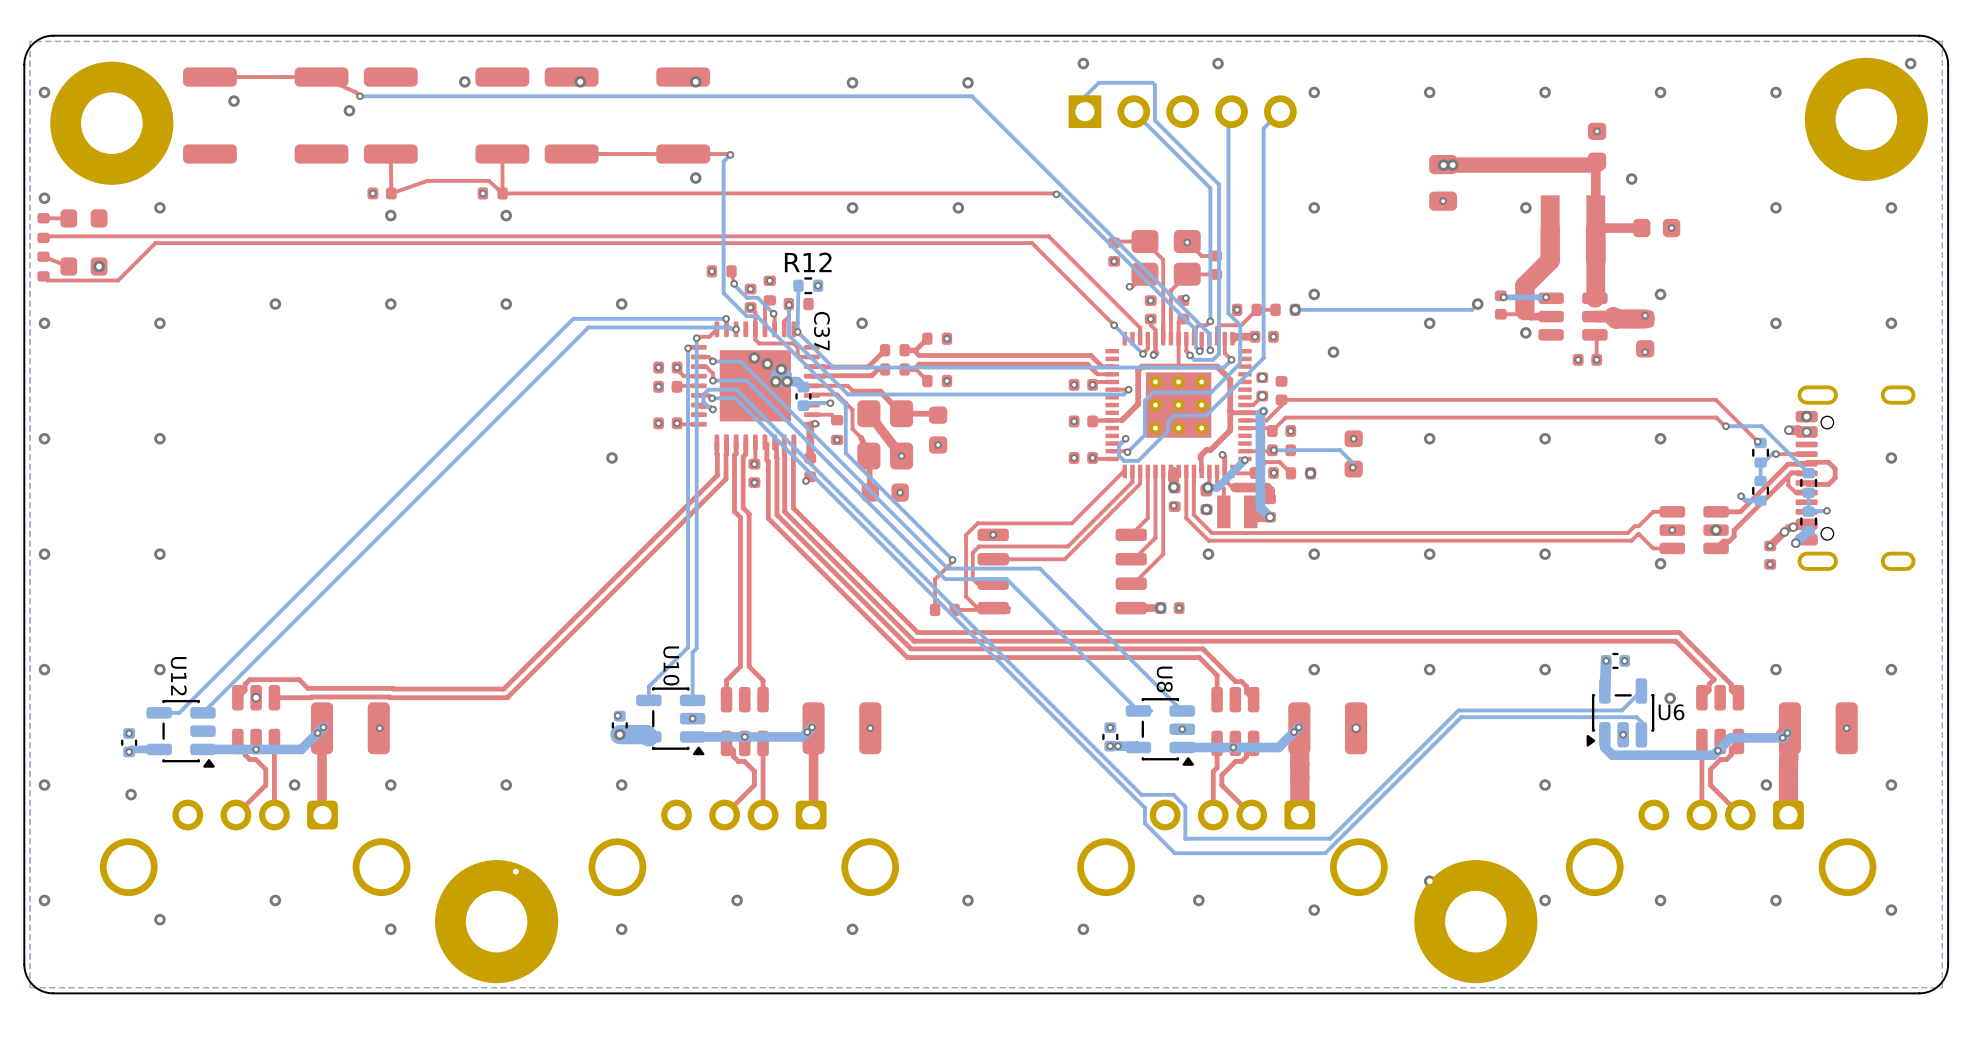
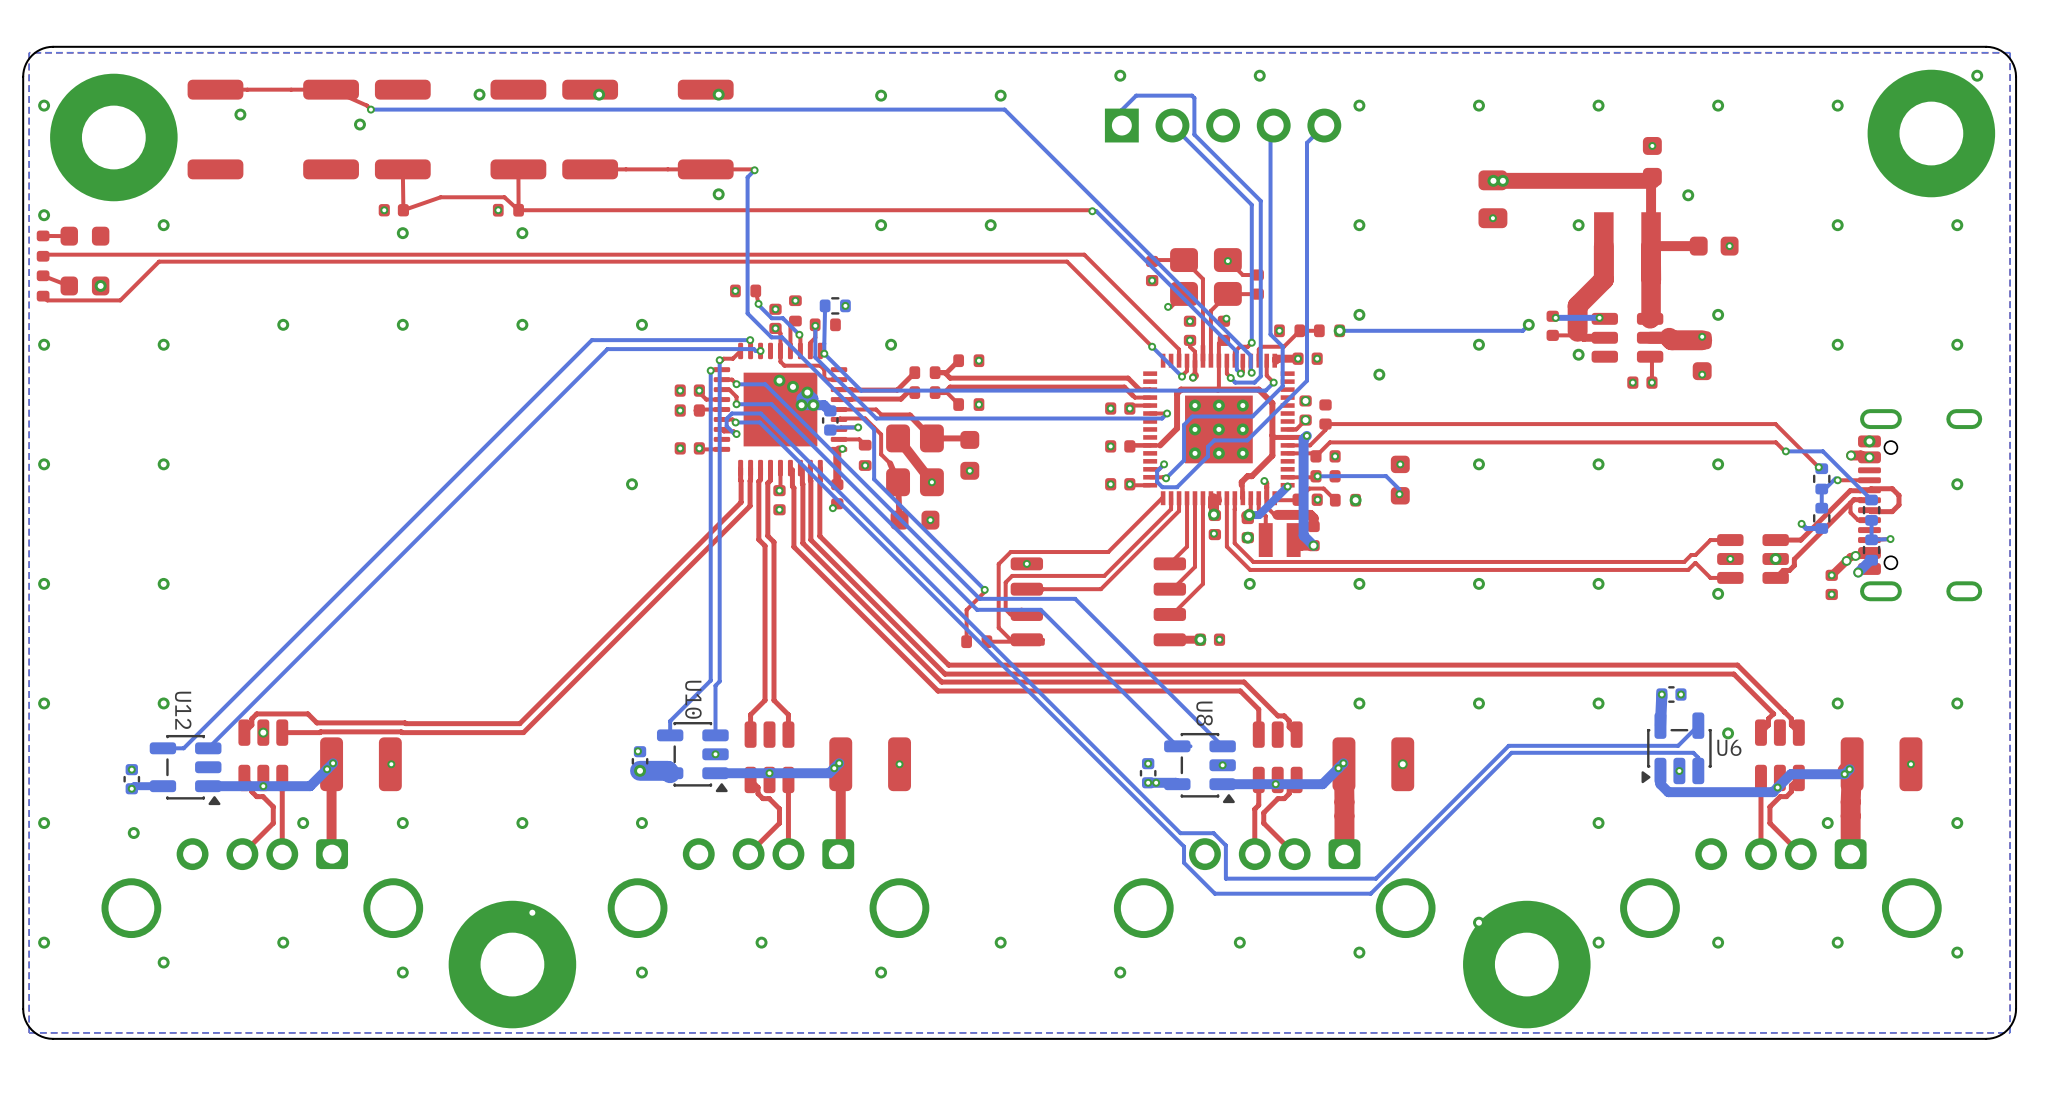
R12 name: R12 (808, 262) -> none
C37 name: C37 (821, 331) -> none

